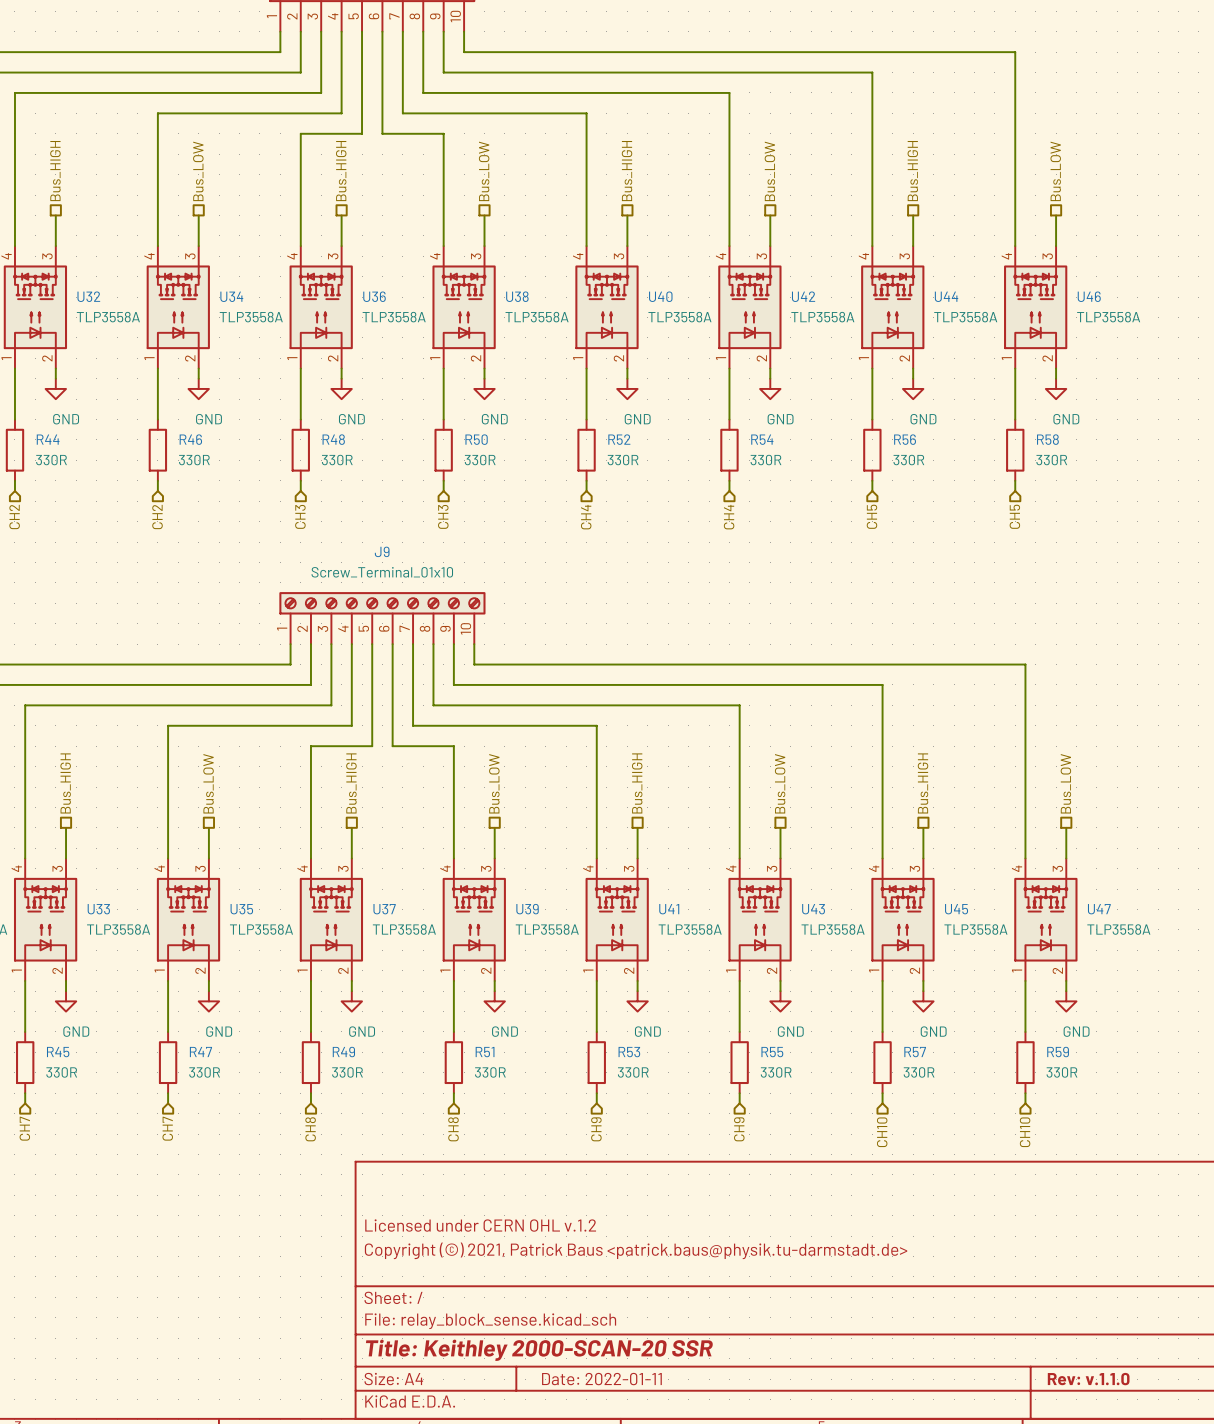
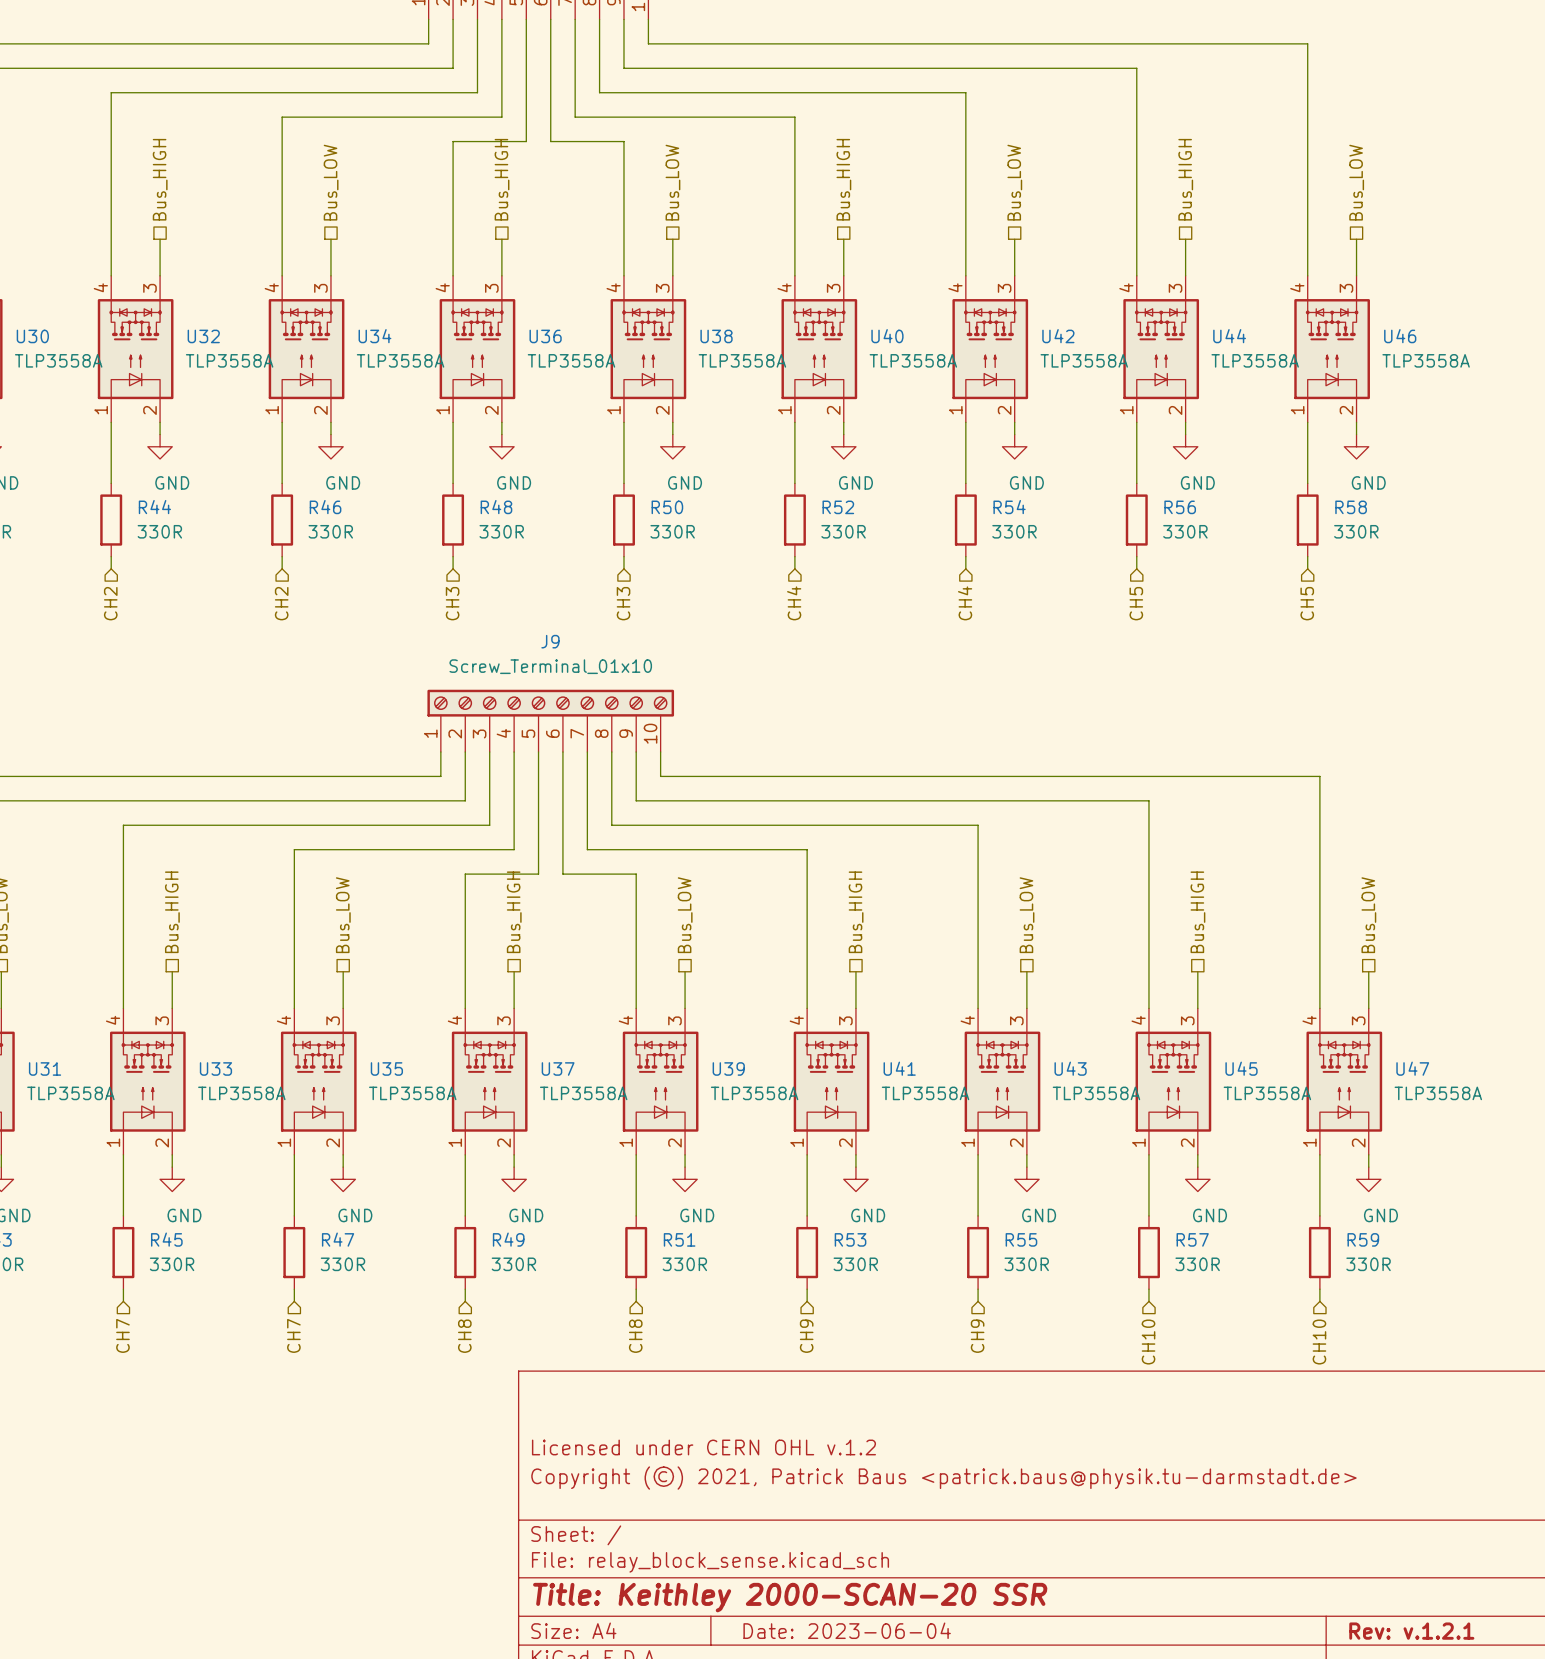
title block: Date: 2022-01-11 (601, 1379) -> Date: 2023-06-04 (847, 1630)
title block: Rev: v.1.1.0 (1088, 1379) -> Rev: v.1.2.1 (1411, 1631)

